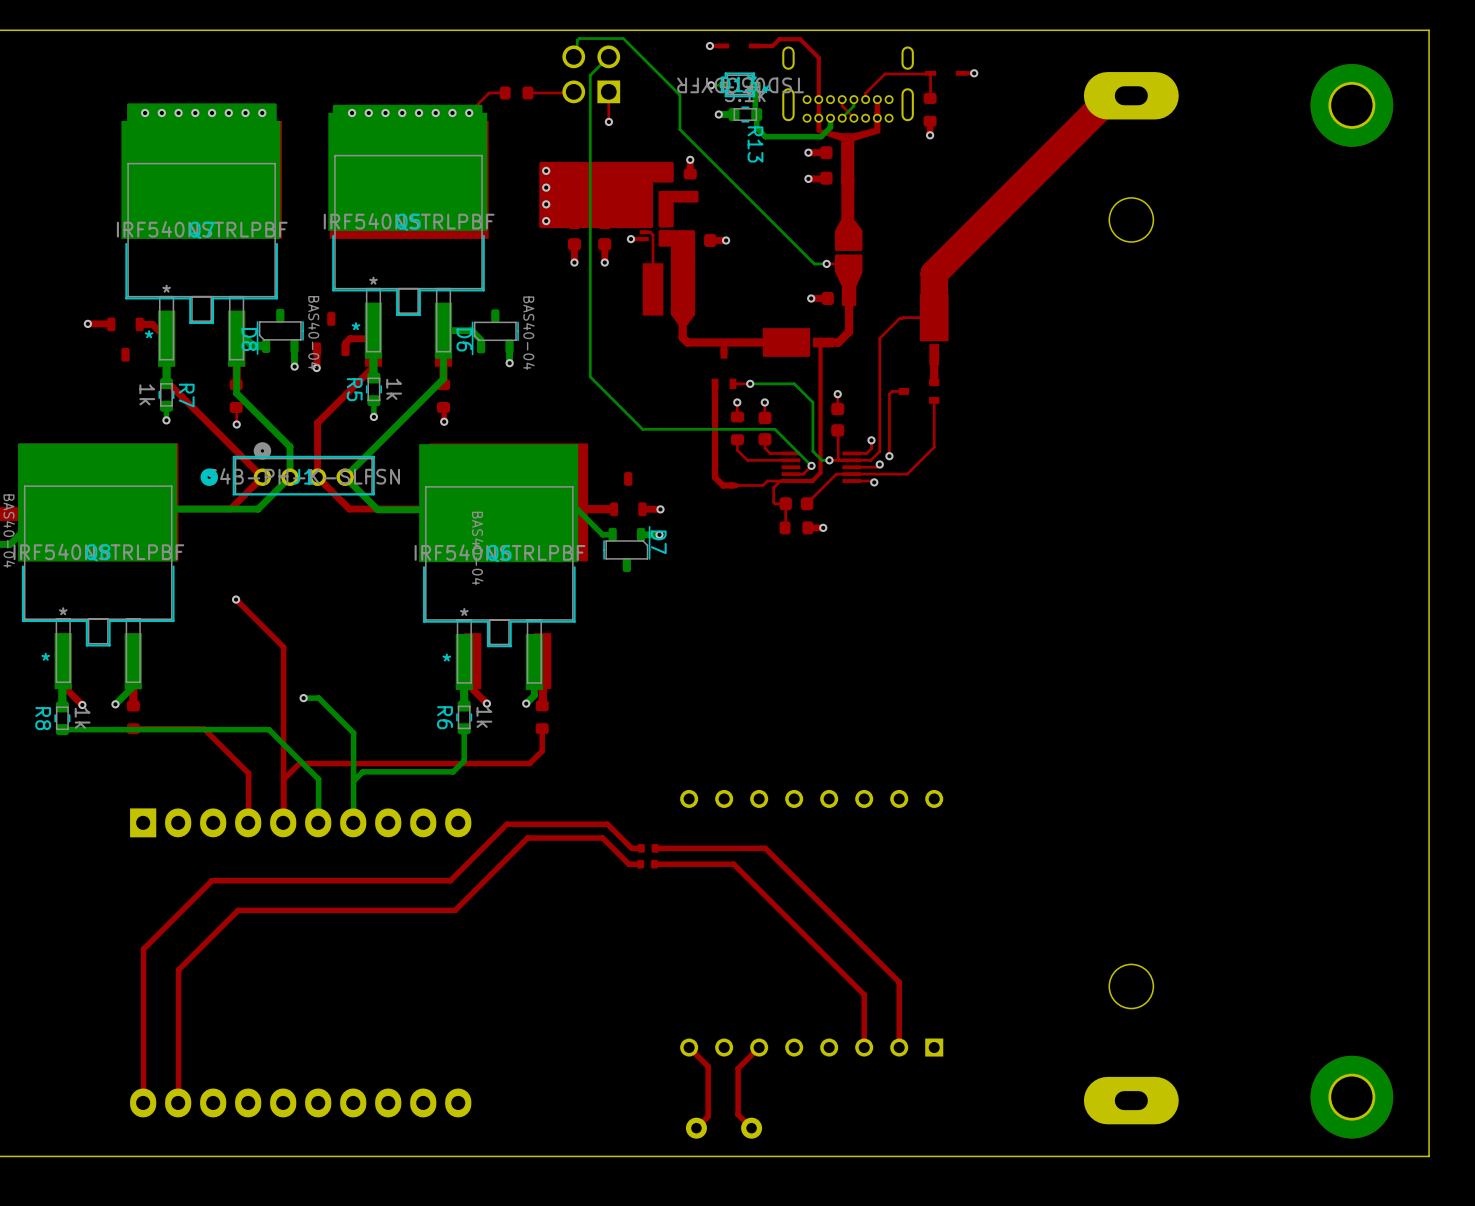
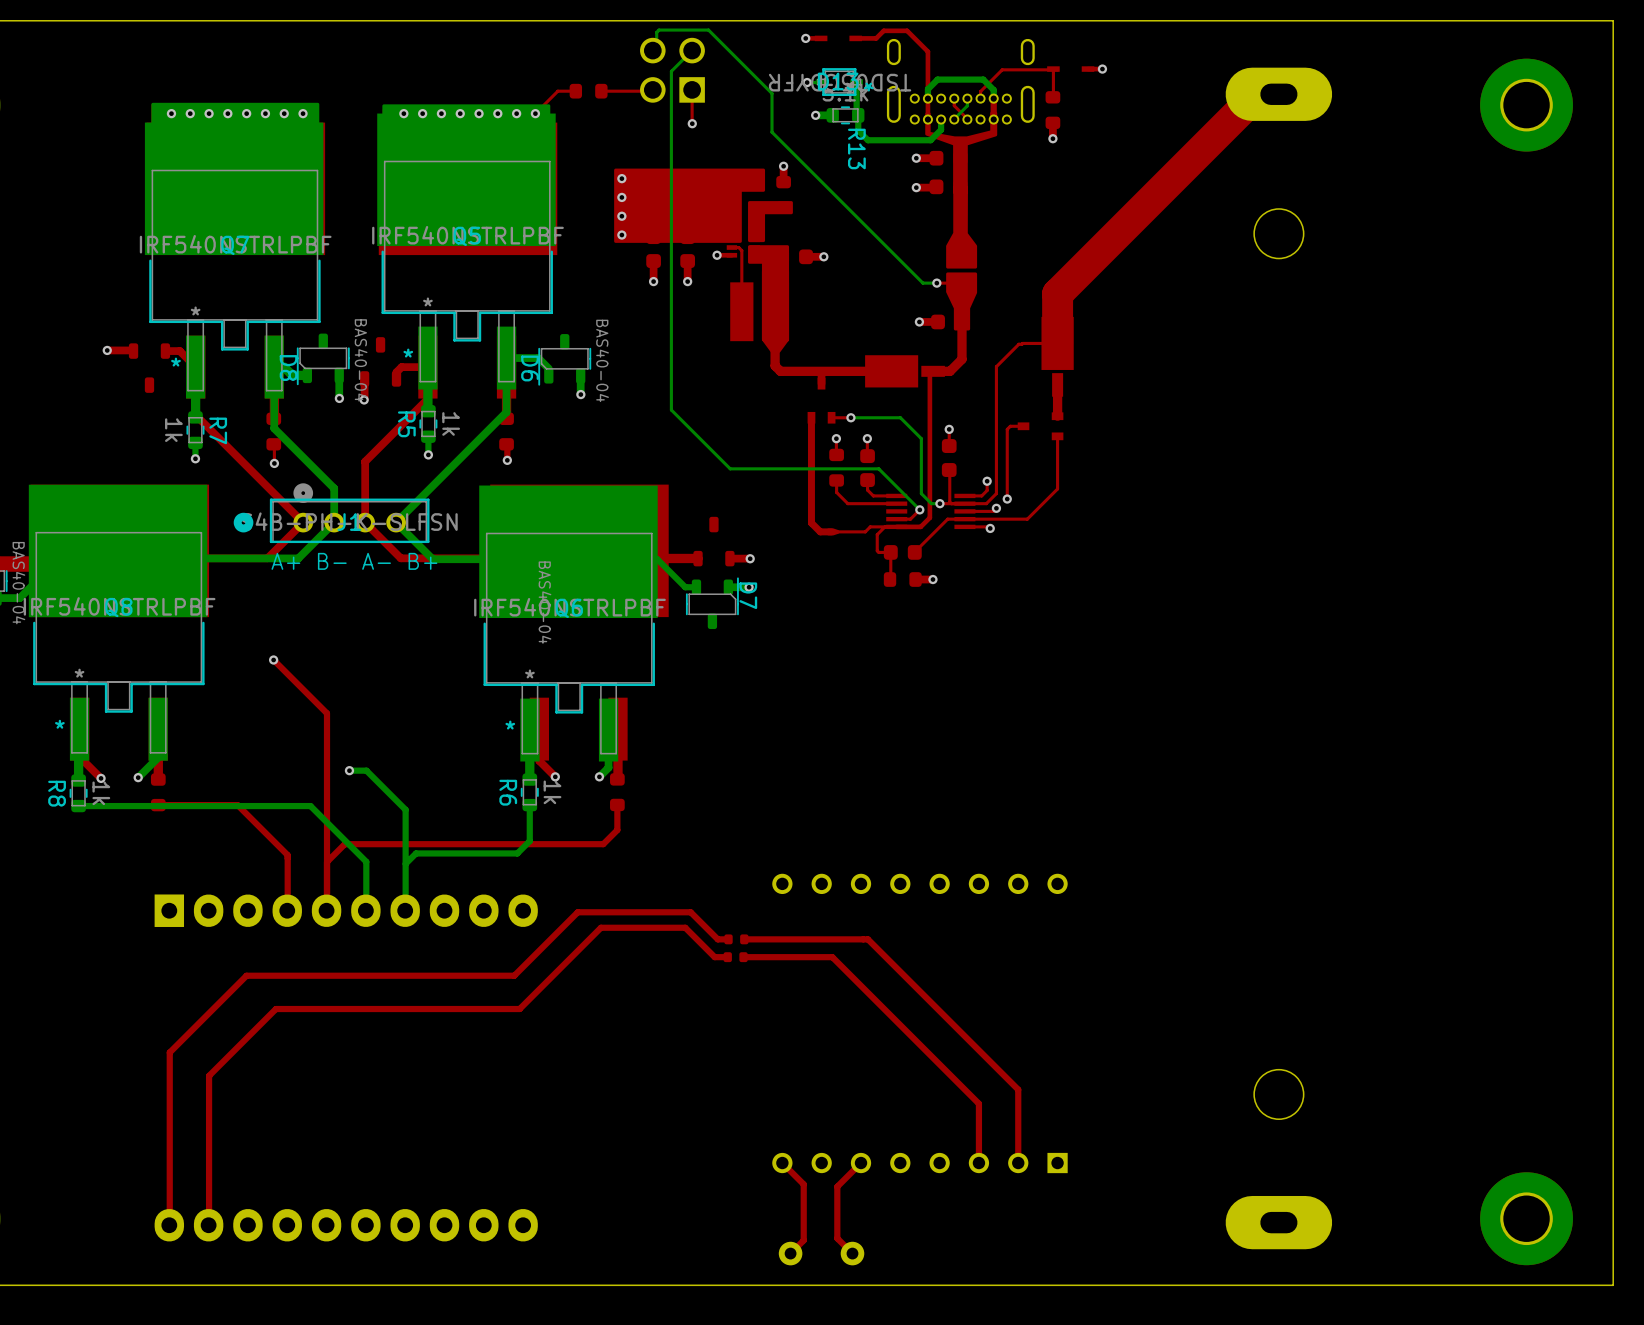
bottom track: none -> (993, 98) (993, 90) (983, 79) (937, 79) (927, 89) (927, 98)
text: none -> A+ B- A- B+ (354, 561)

